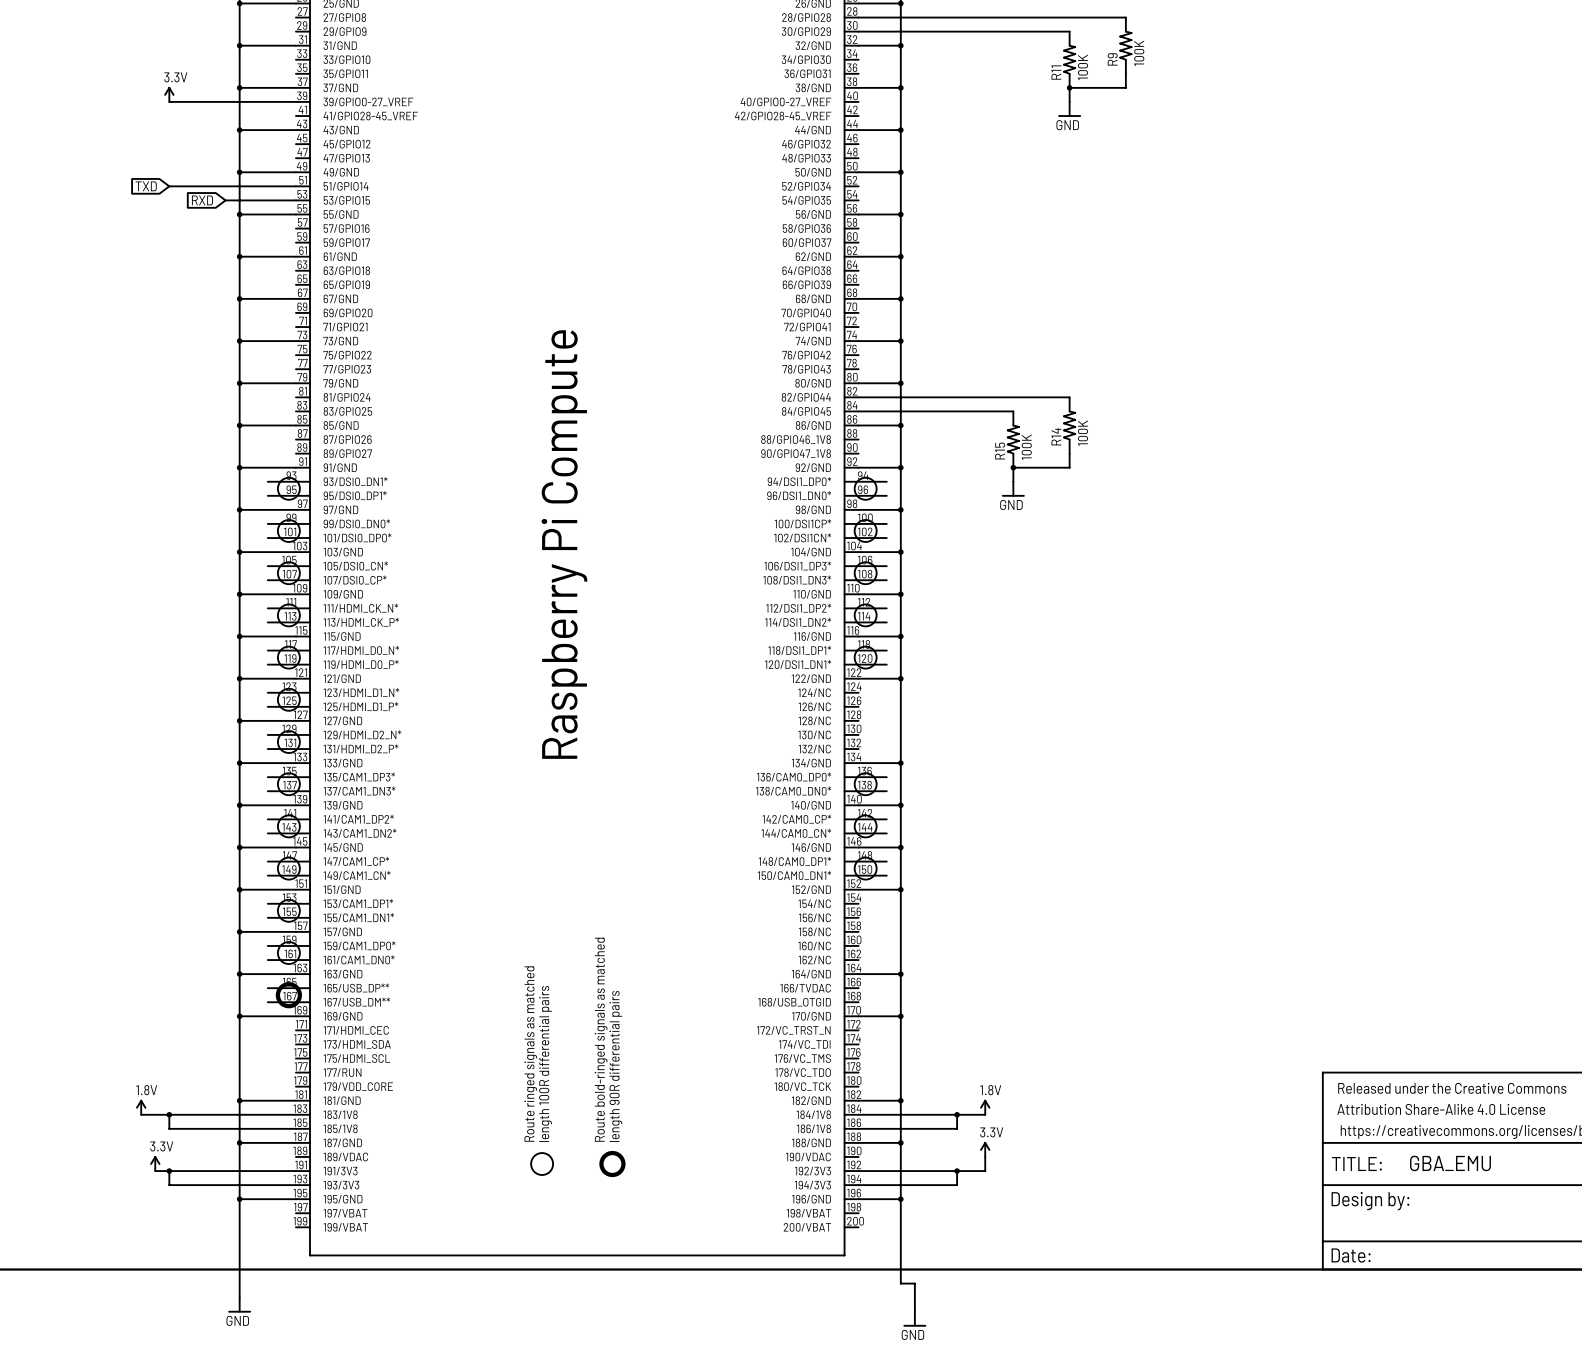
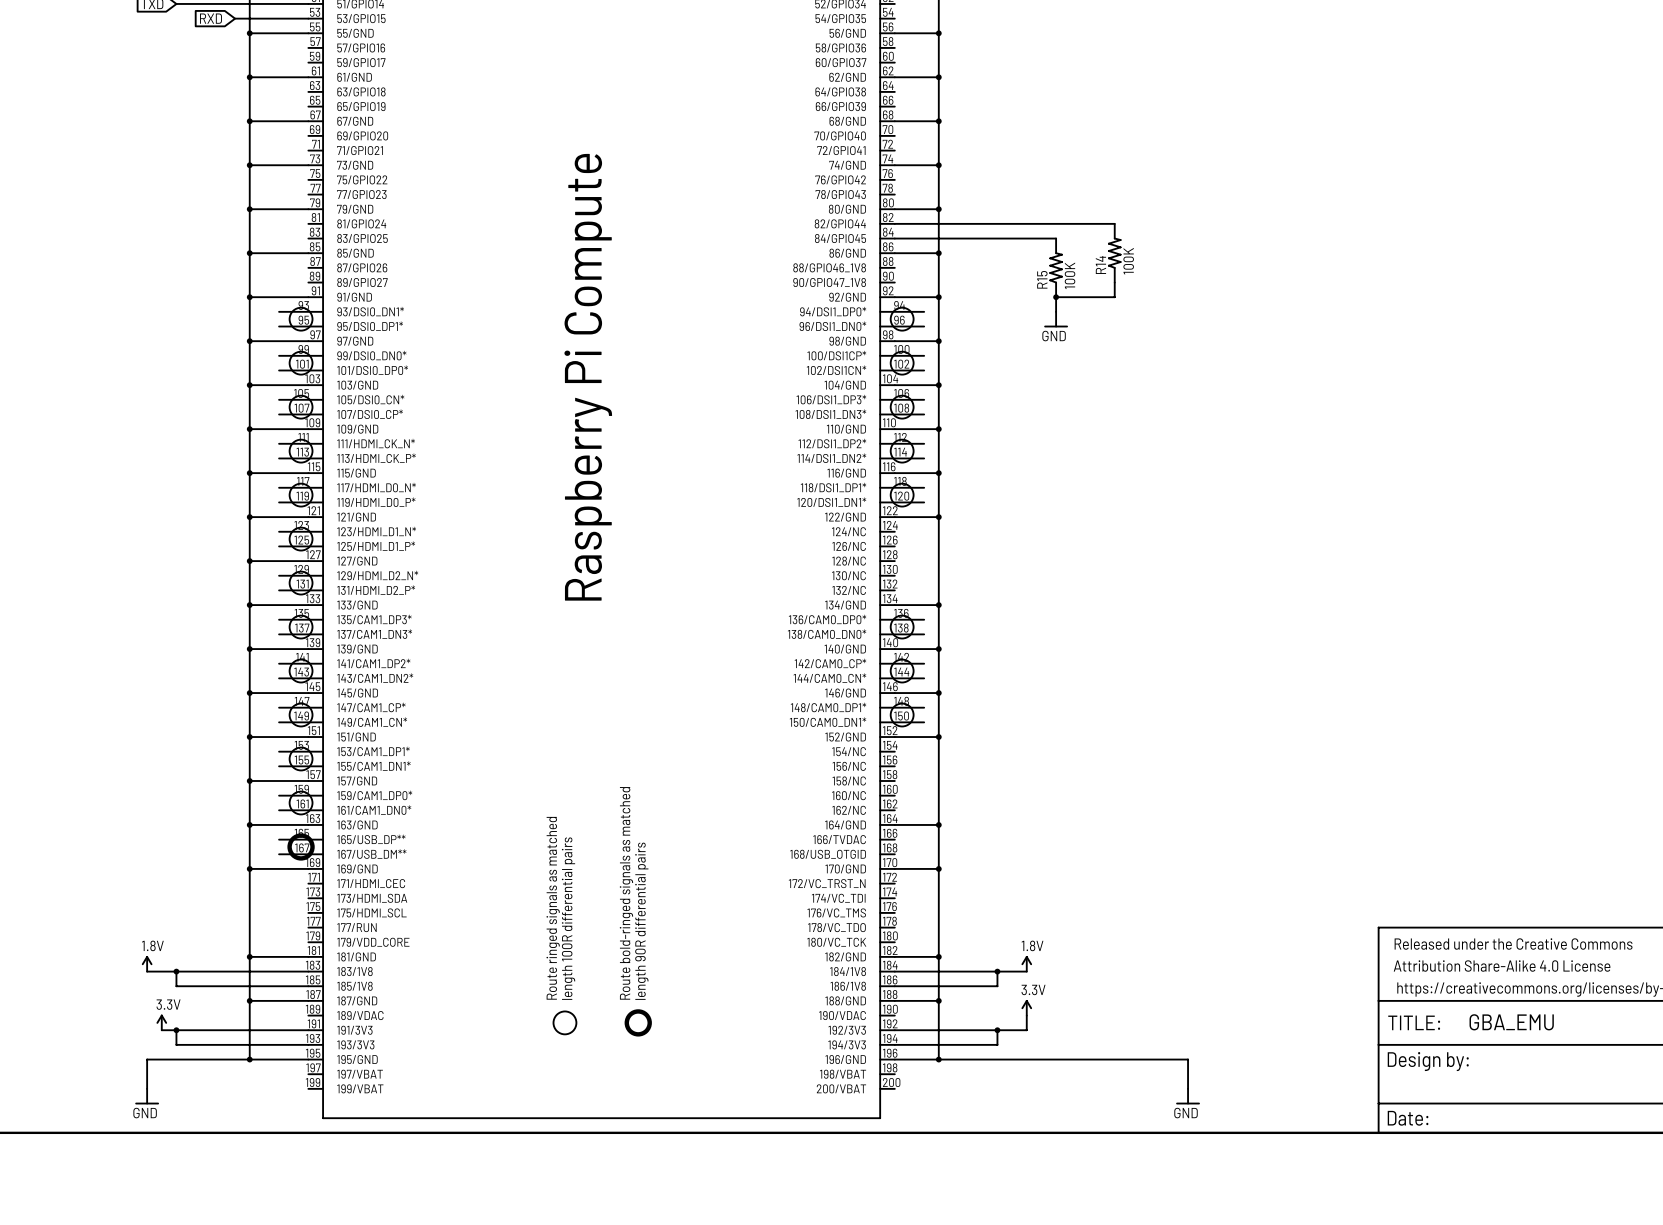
wire: (239, 1199) (239, 1297) -> (249, 1059) (147, 1059) (147, 1088)
wire: (900, 1199) (900, 1283) (914, 1283) (914, 1311) -> (938, 1059) (1188, 1059) (1188, 1088)
power symbol: none -> GND (1188, 1096)
power symbol position: GND (239, 1305) -> GND (147, 1096)
power symbol: GND (914, 1319) -> none

